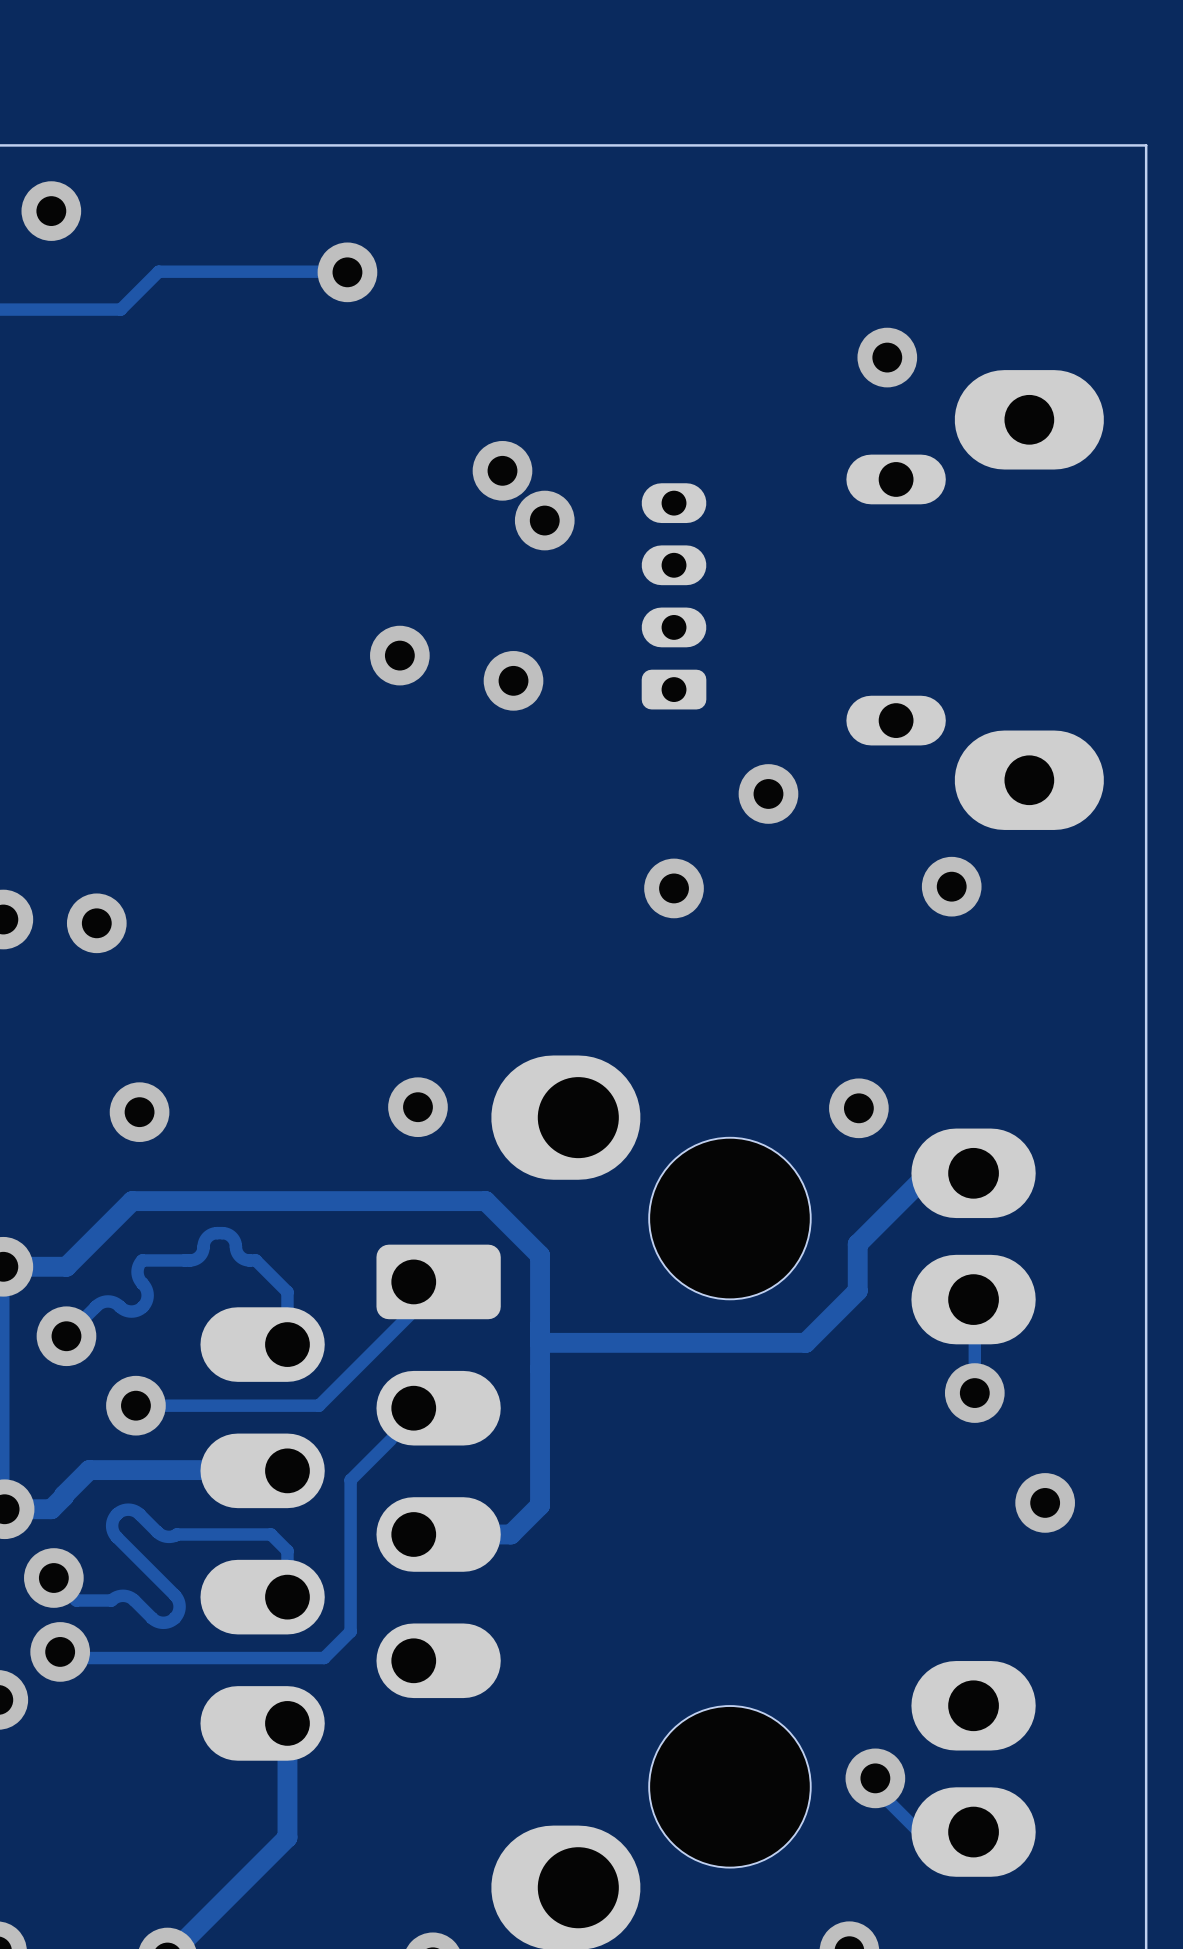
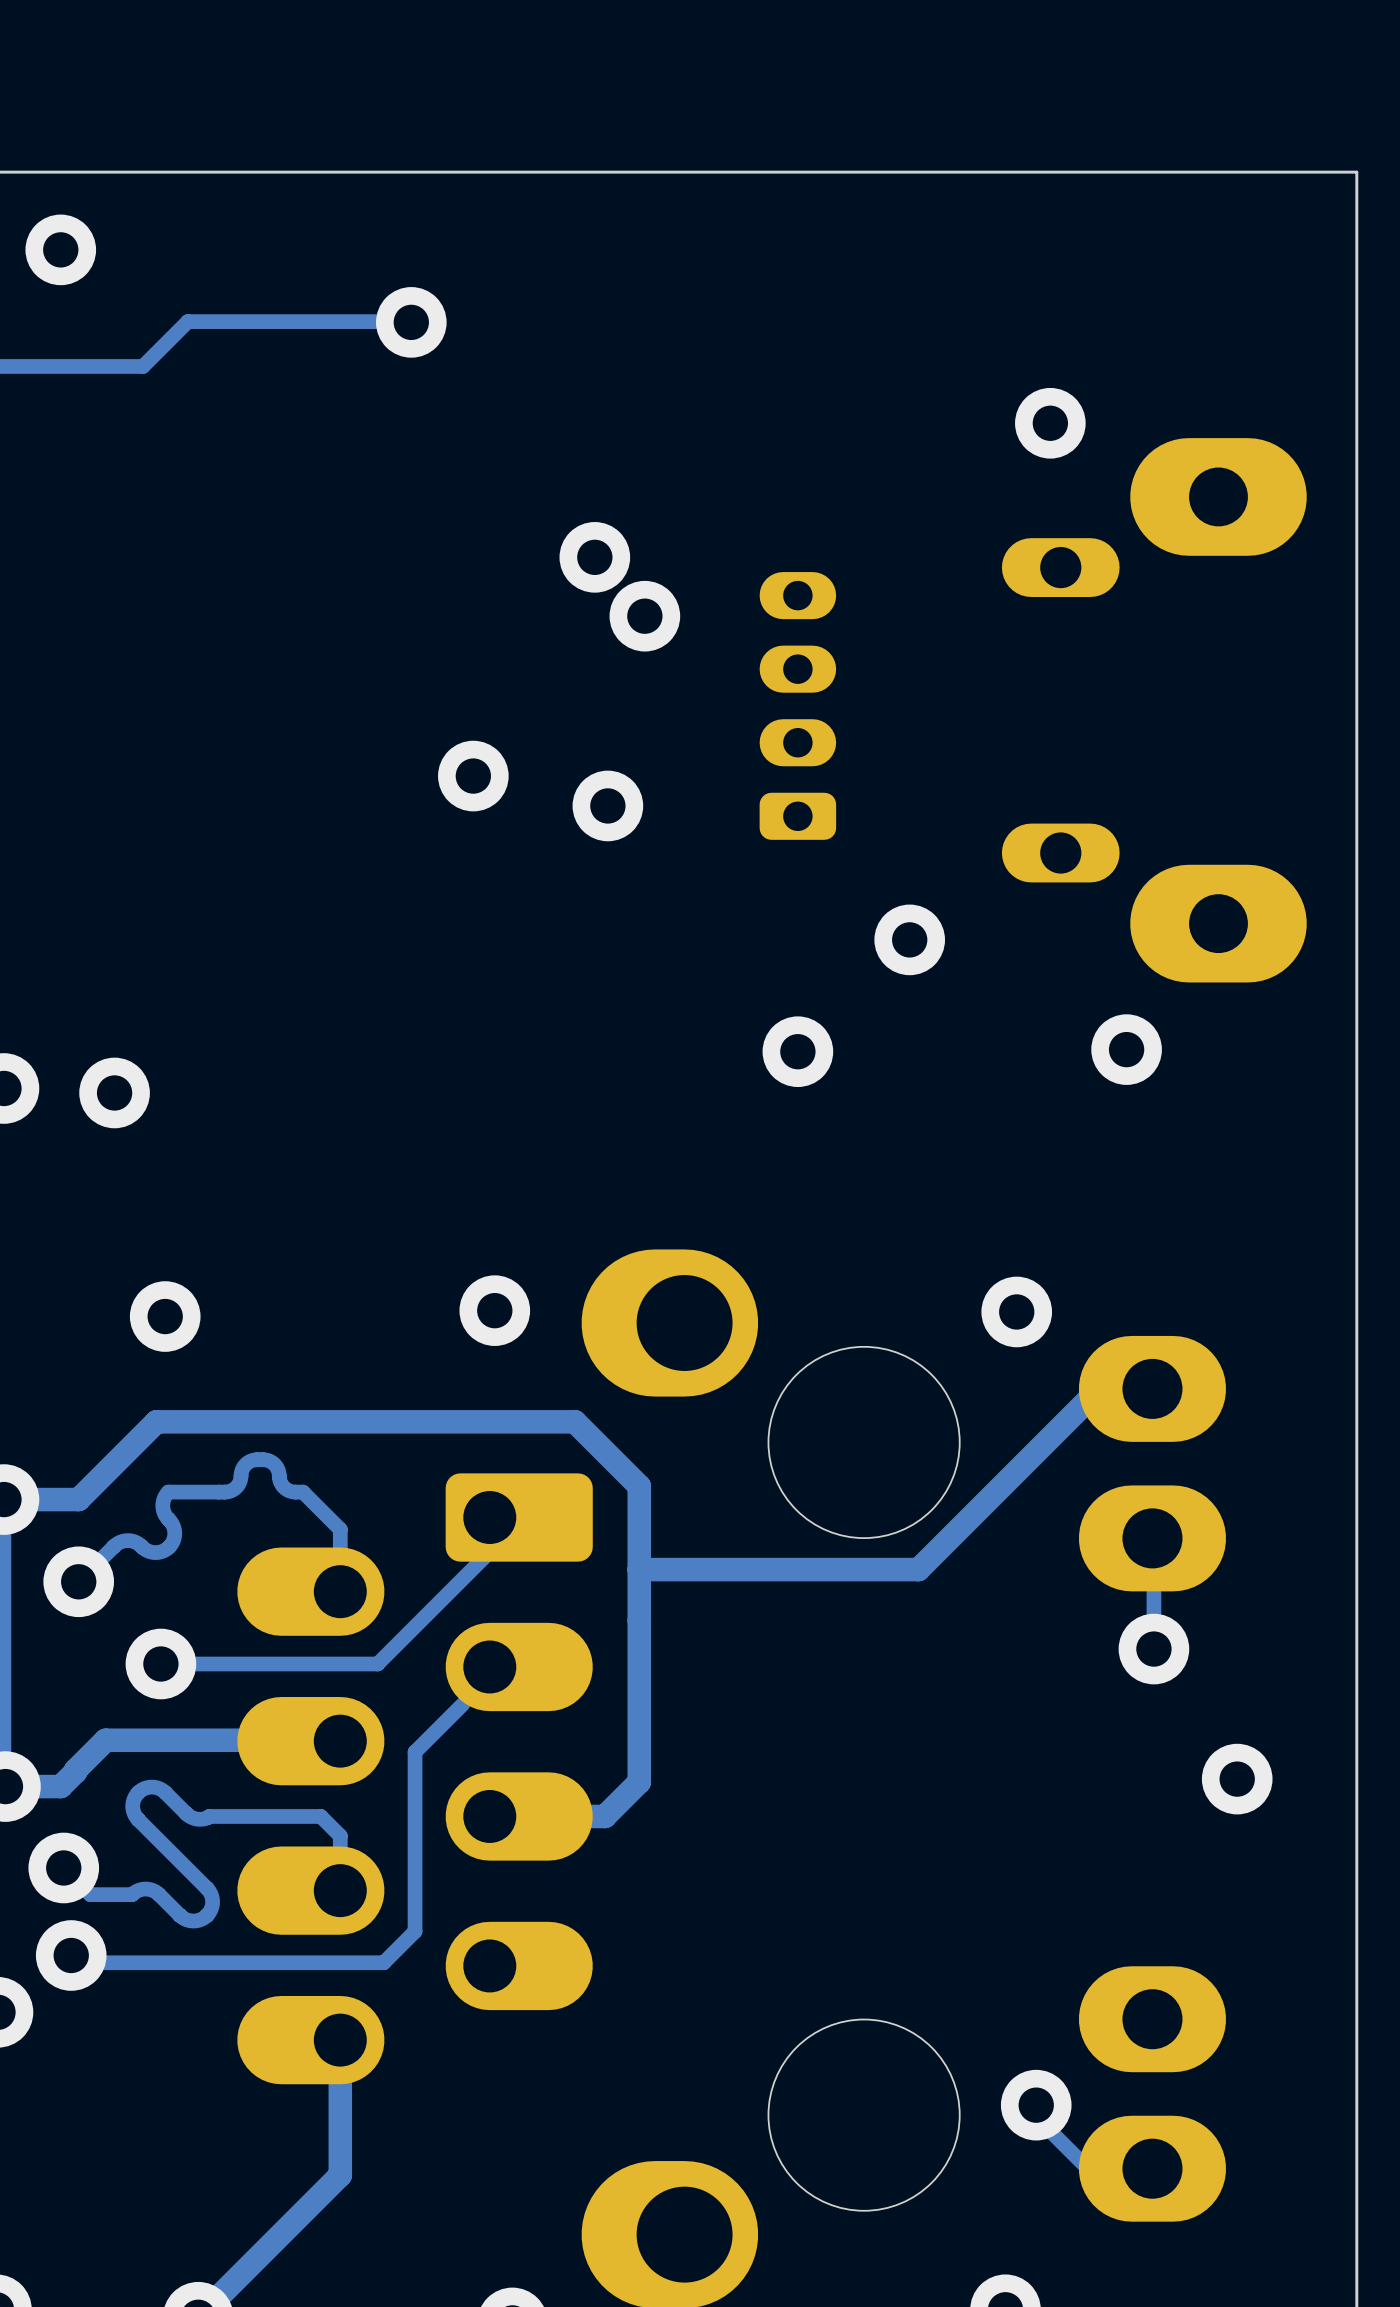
track: (857, 1244) (857, 1290) (805, 1342) (540, 1342) -> (1015, 1472) (918, 1569) (639, 1569)

